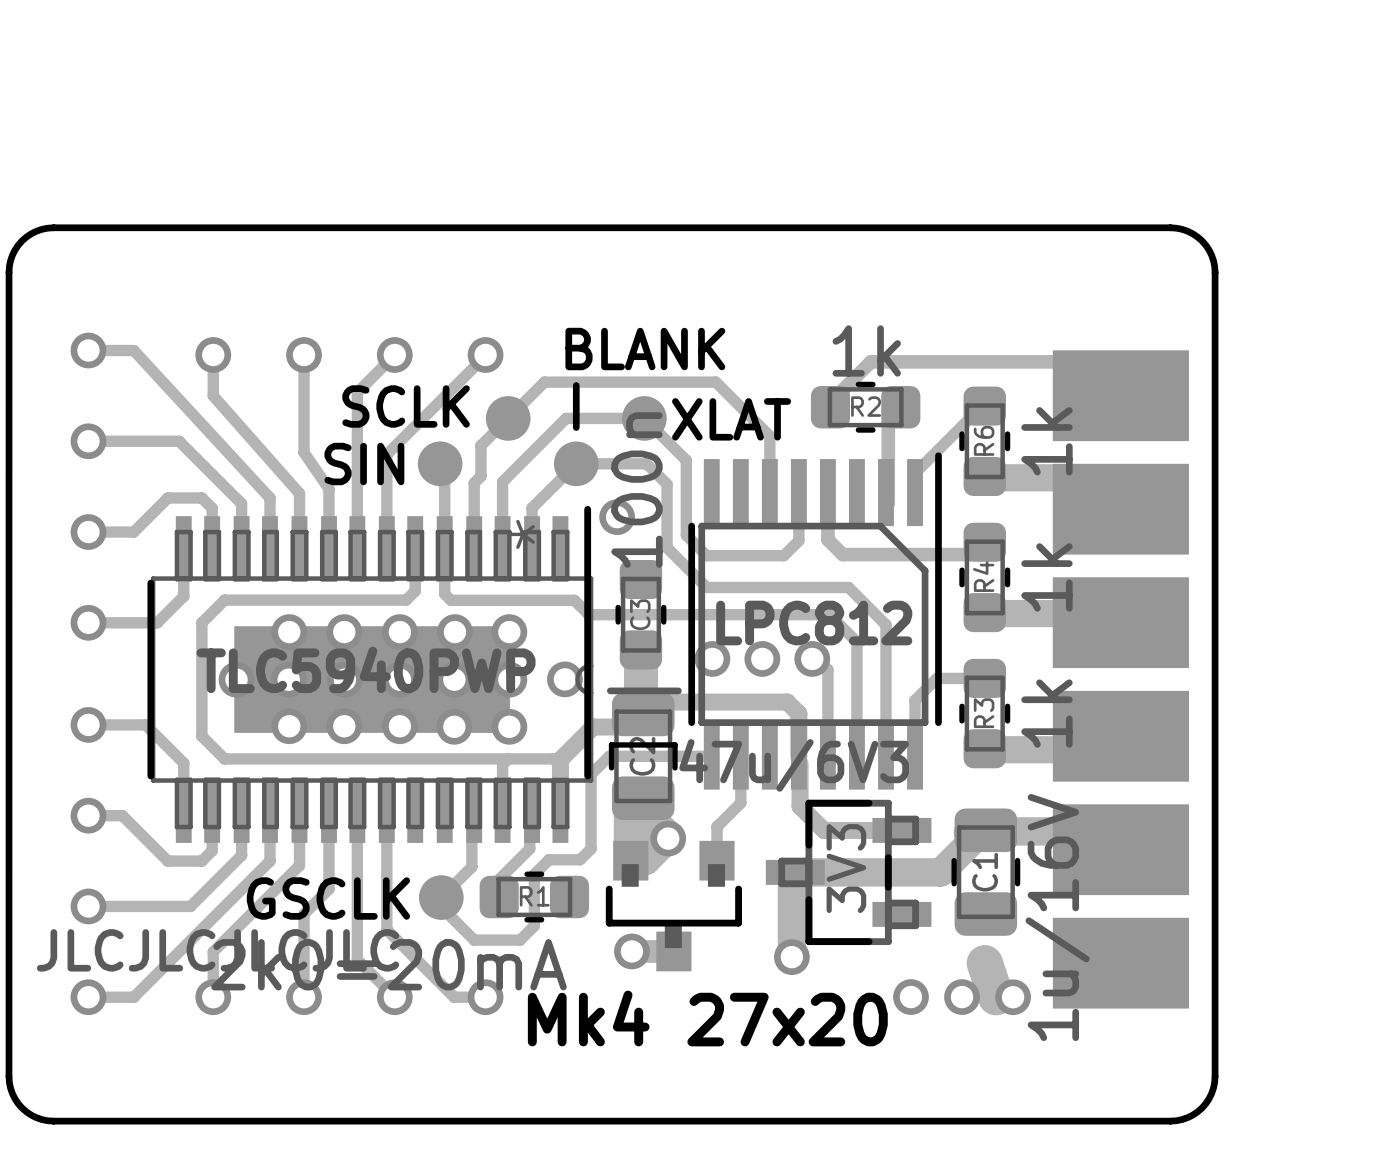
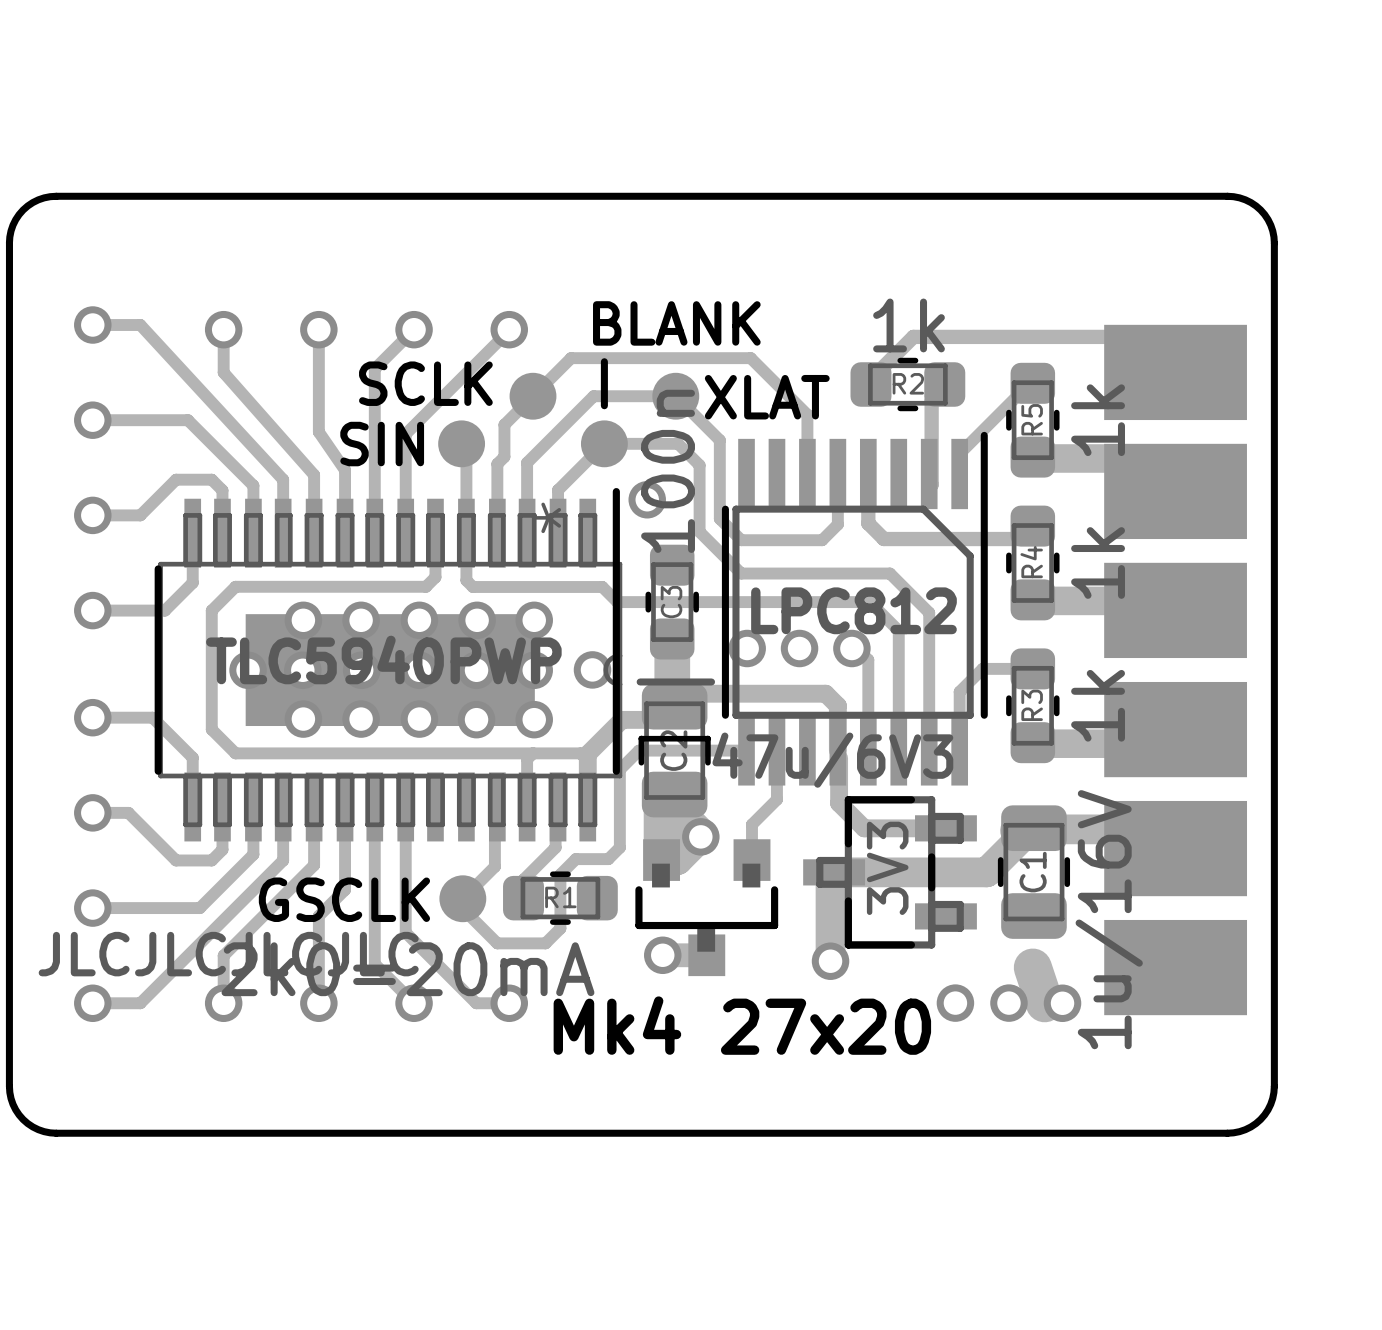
R6 name: R6 (984, 440) -> R5 (1032, 419)

